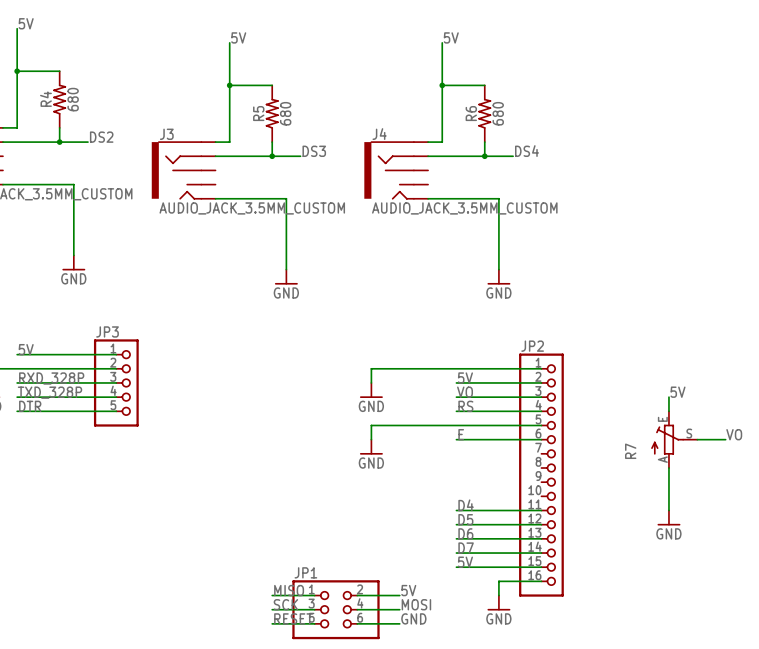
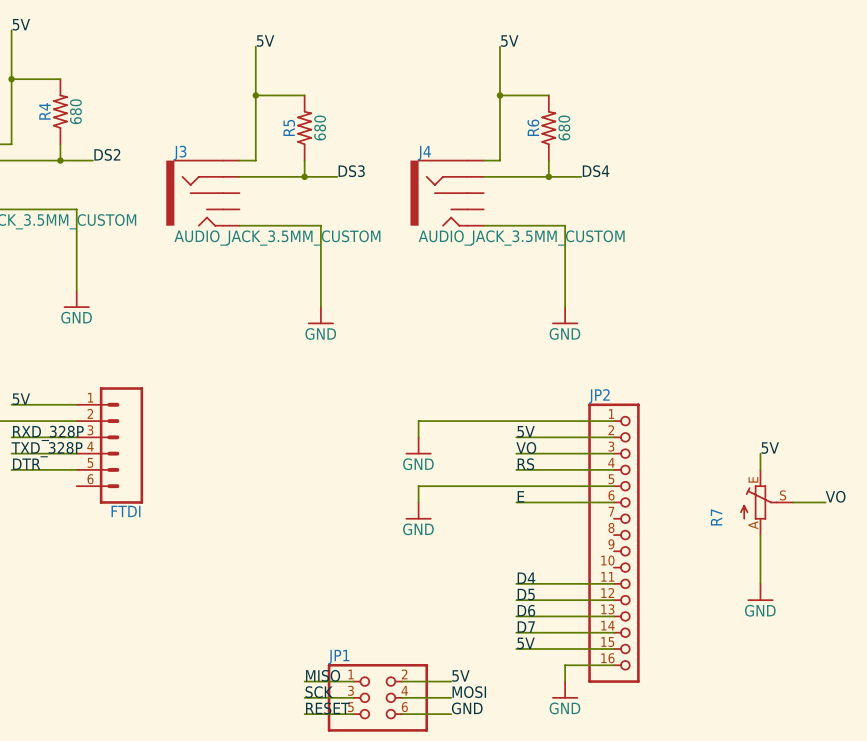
JP3: (116, 382) -> none
FTDI: none -> (109, 445)

